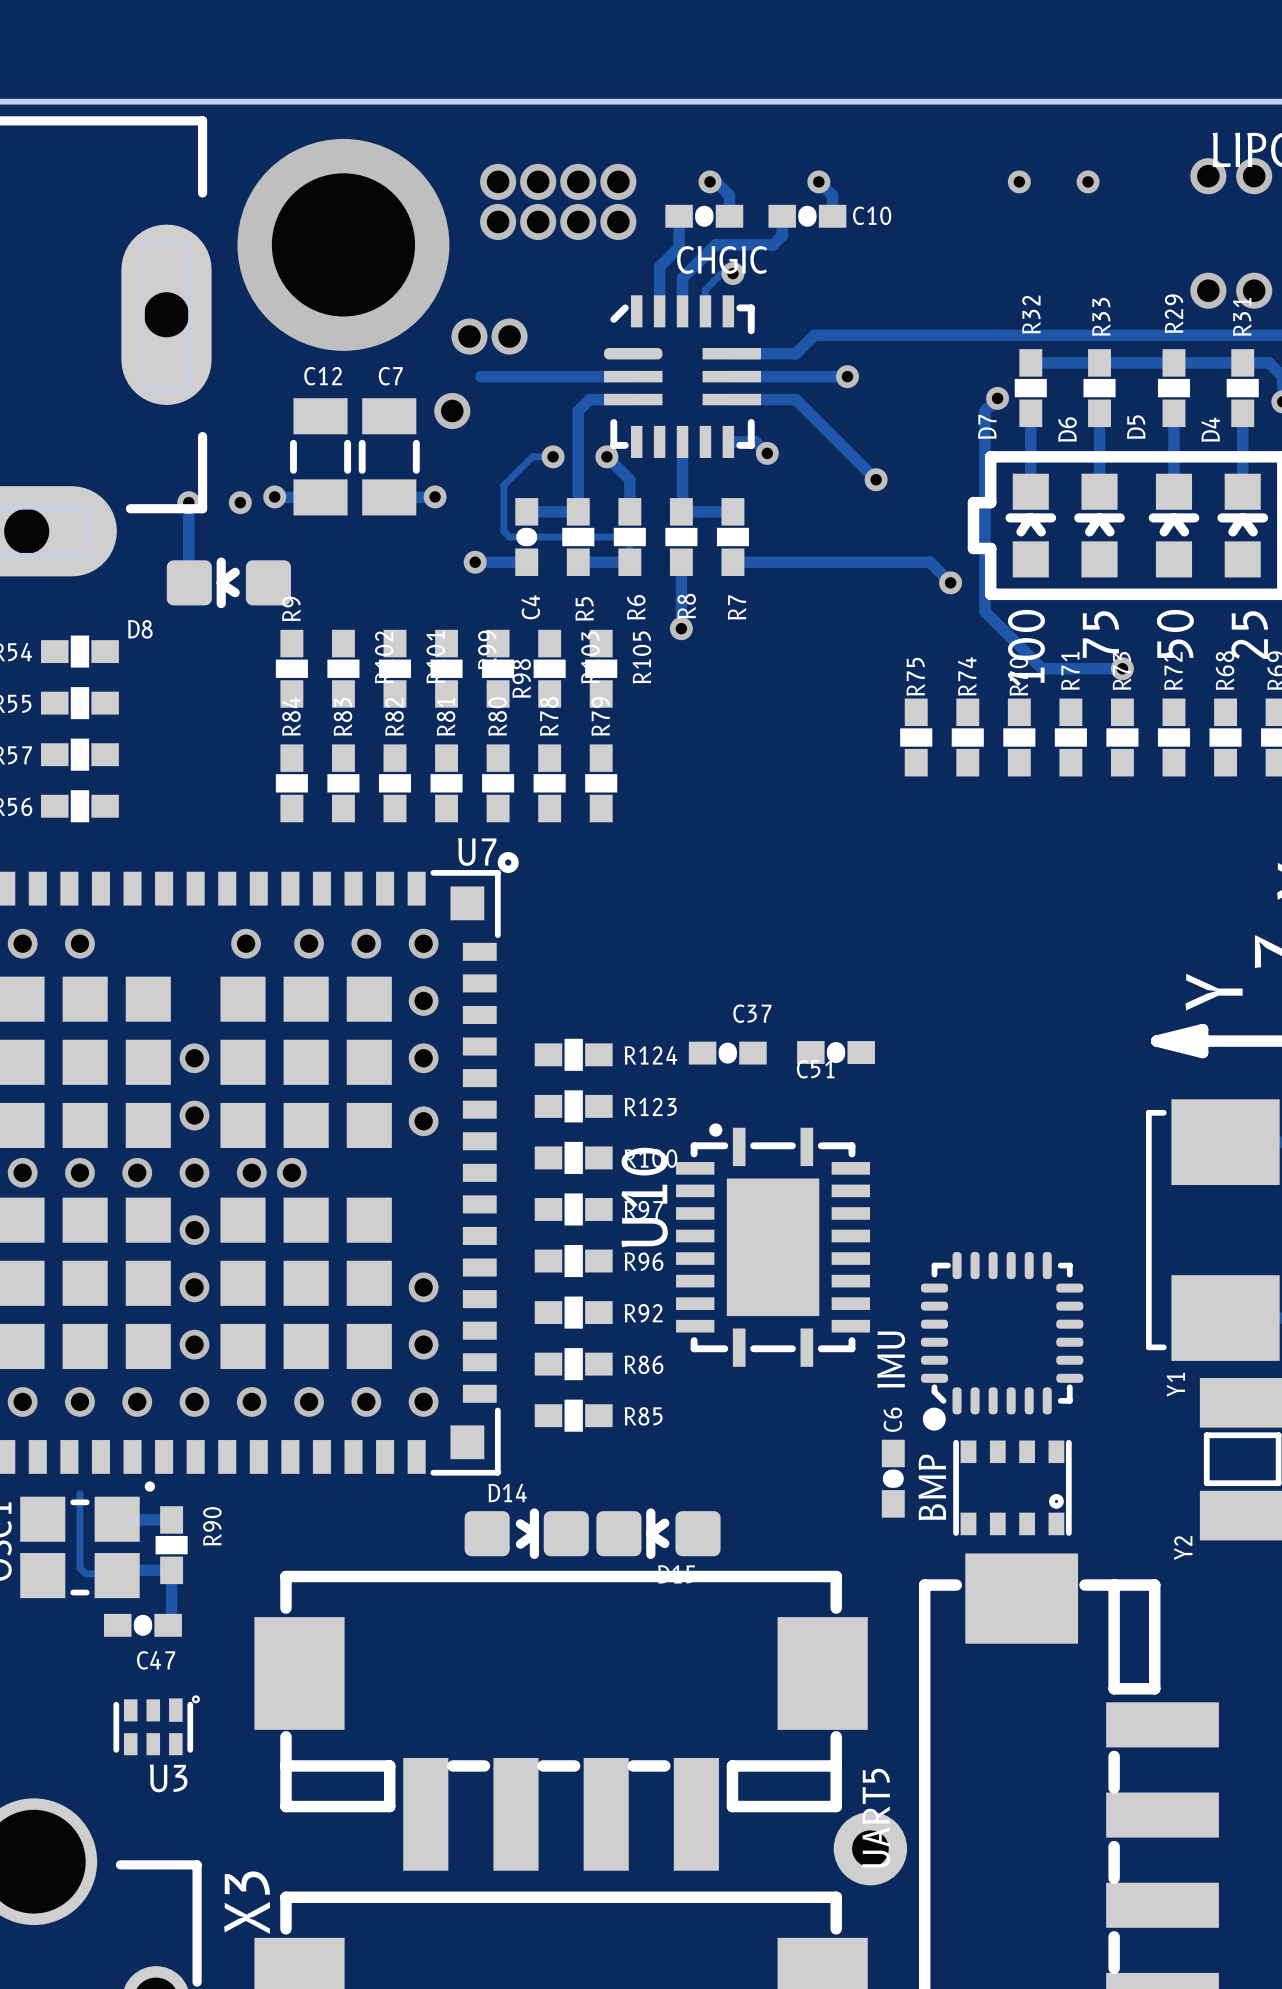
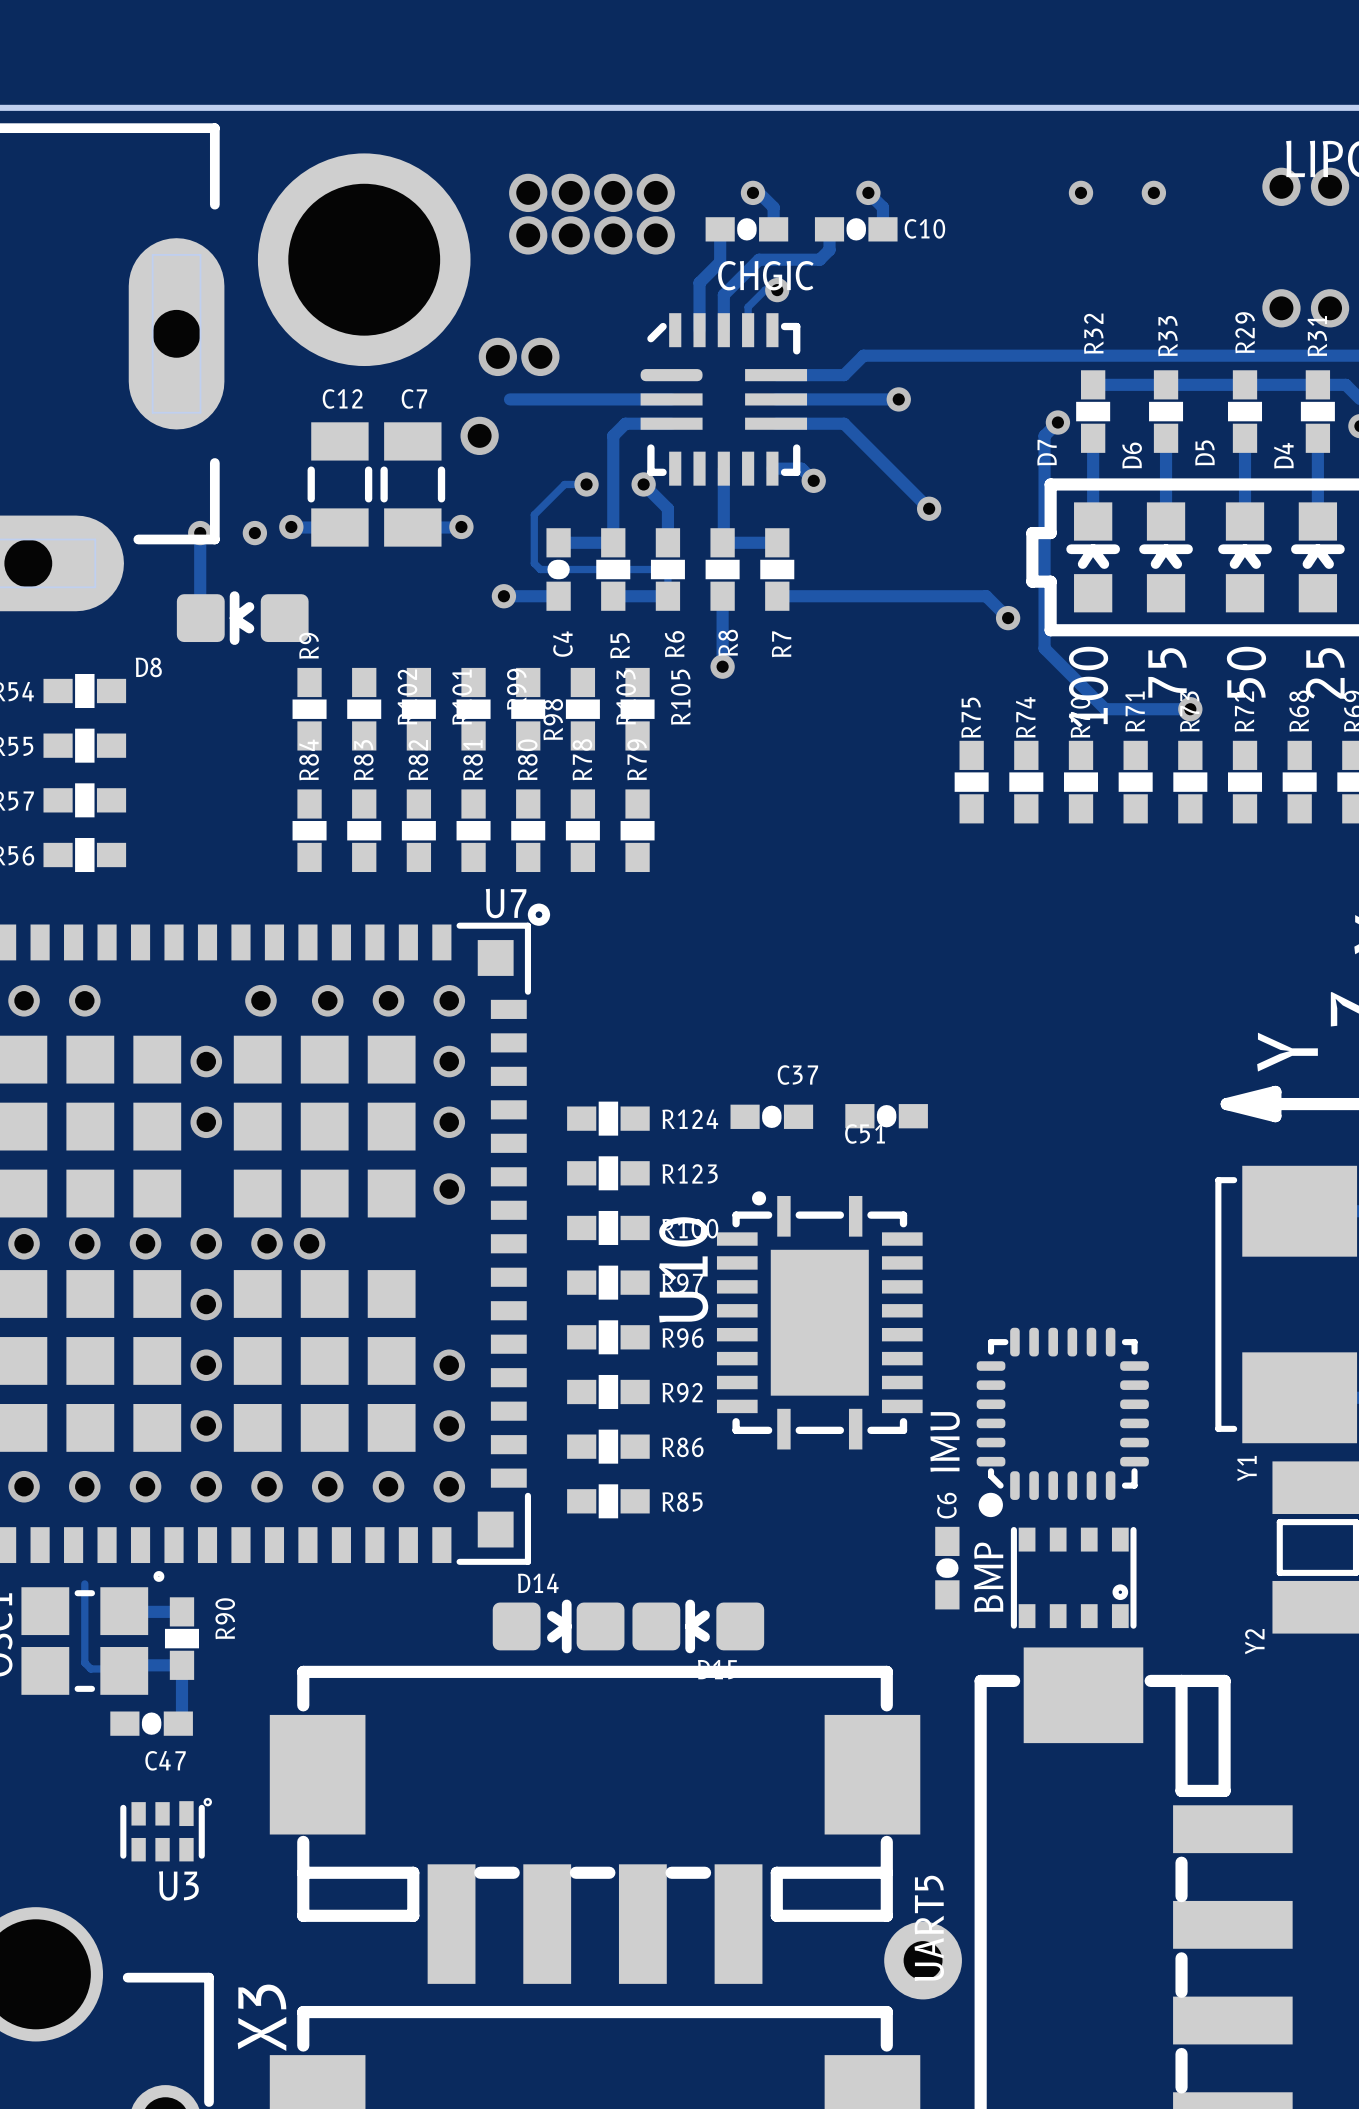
via: (343, 244) -> none
part: none -> (364, 259)
via position: (194, 1115) -> (206, 1061)

